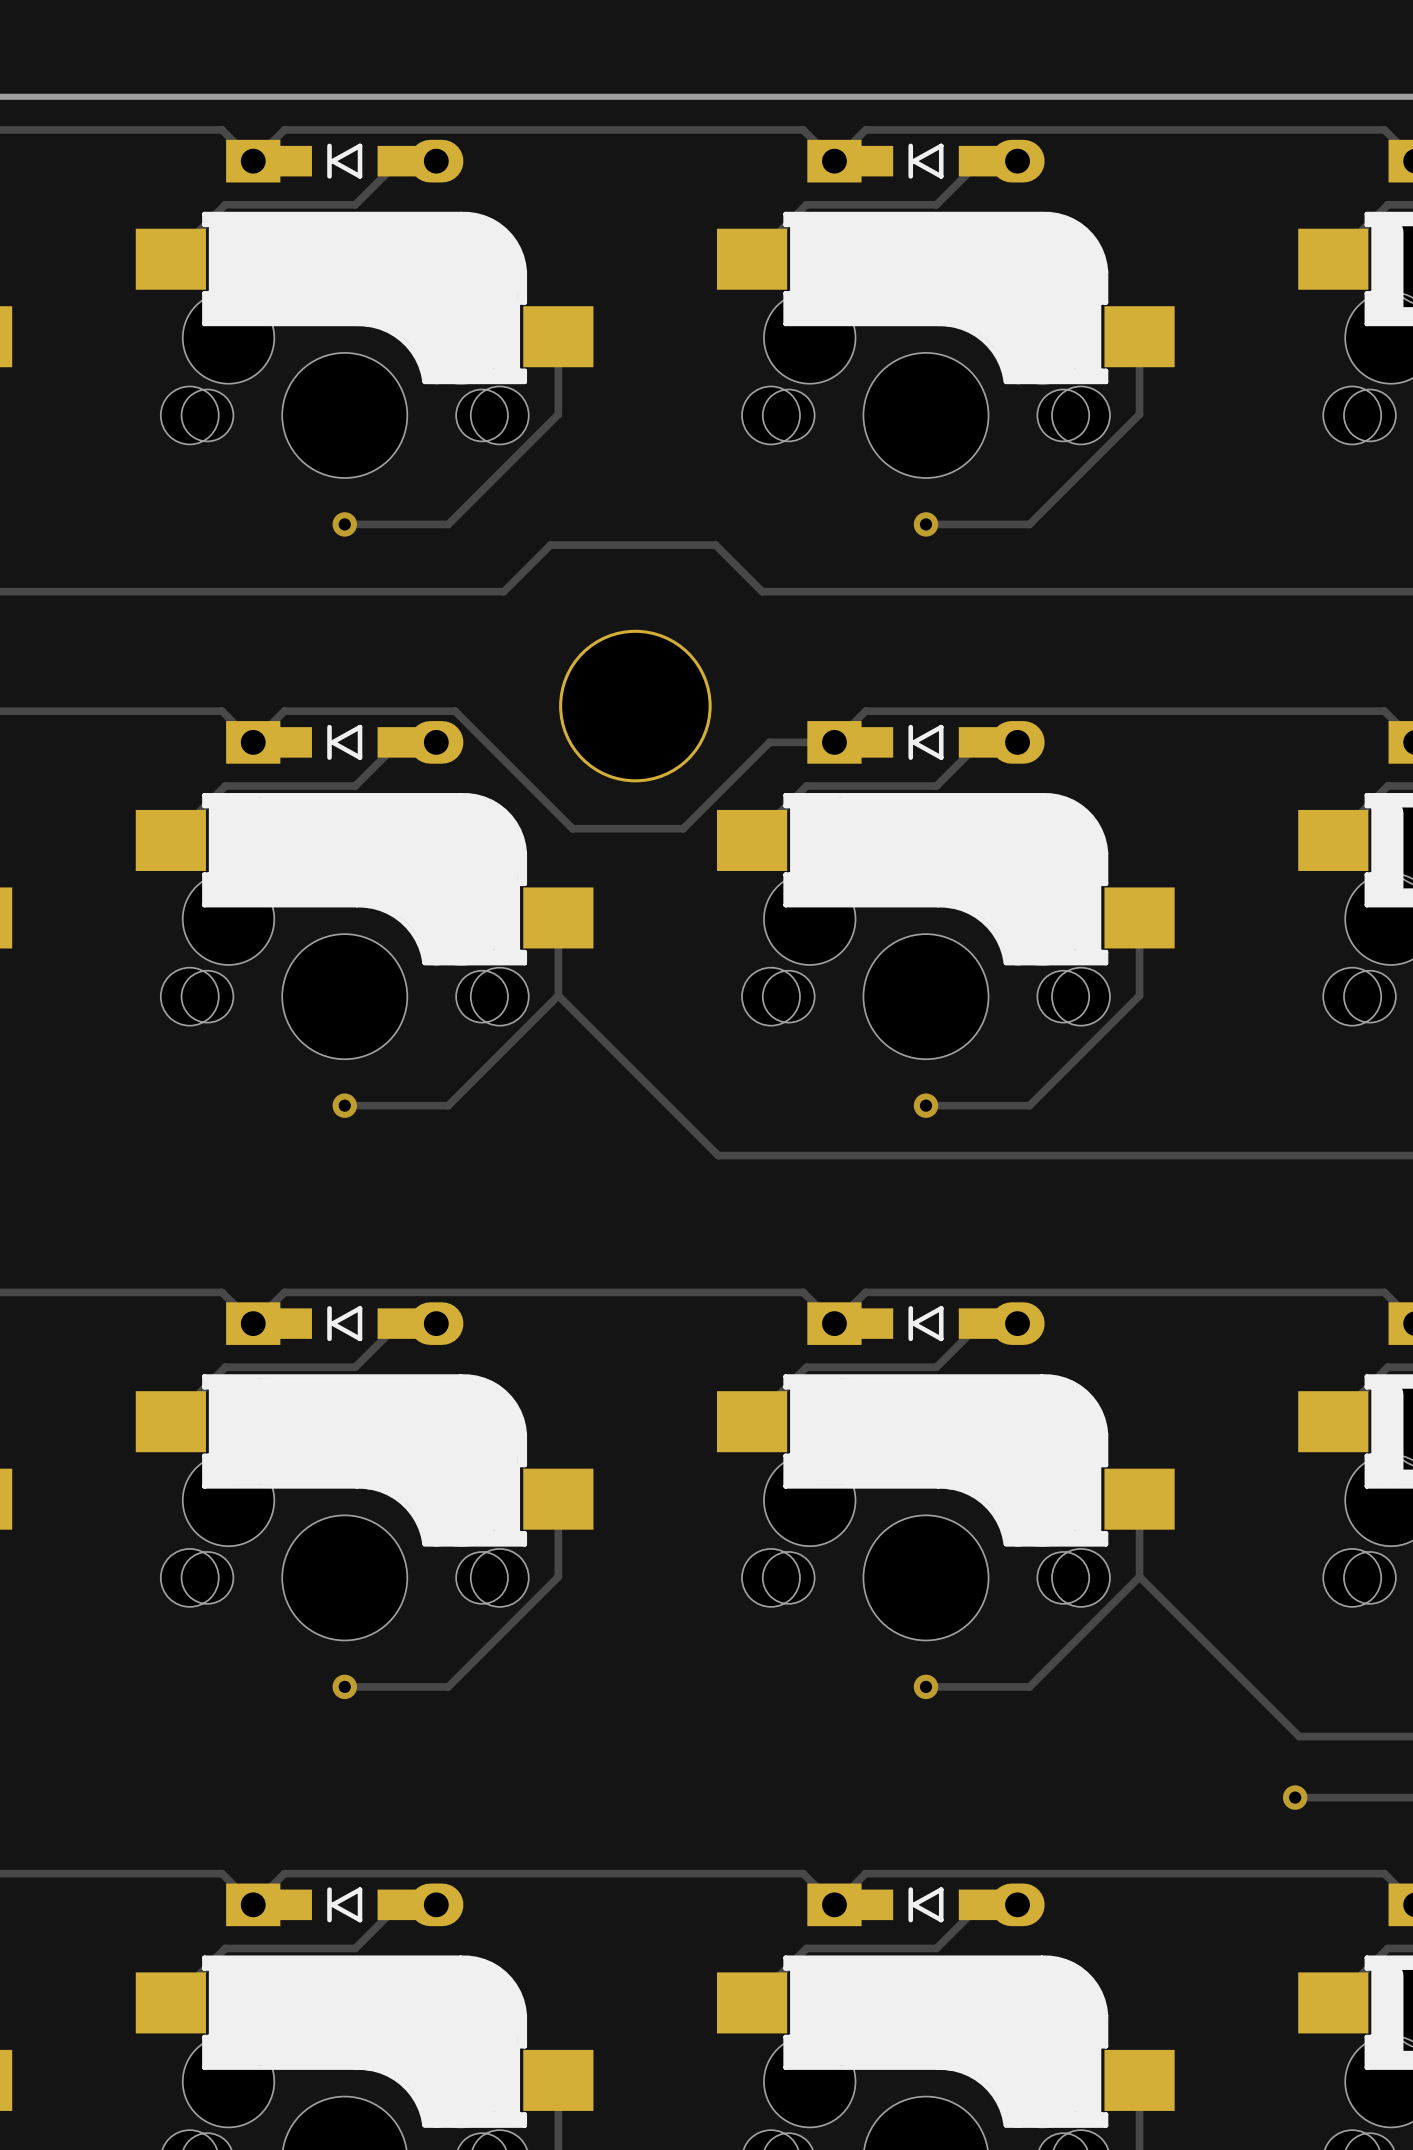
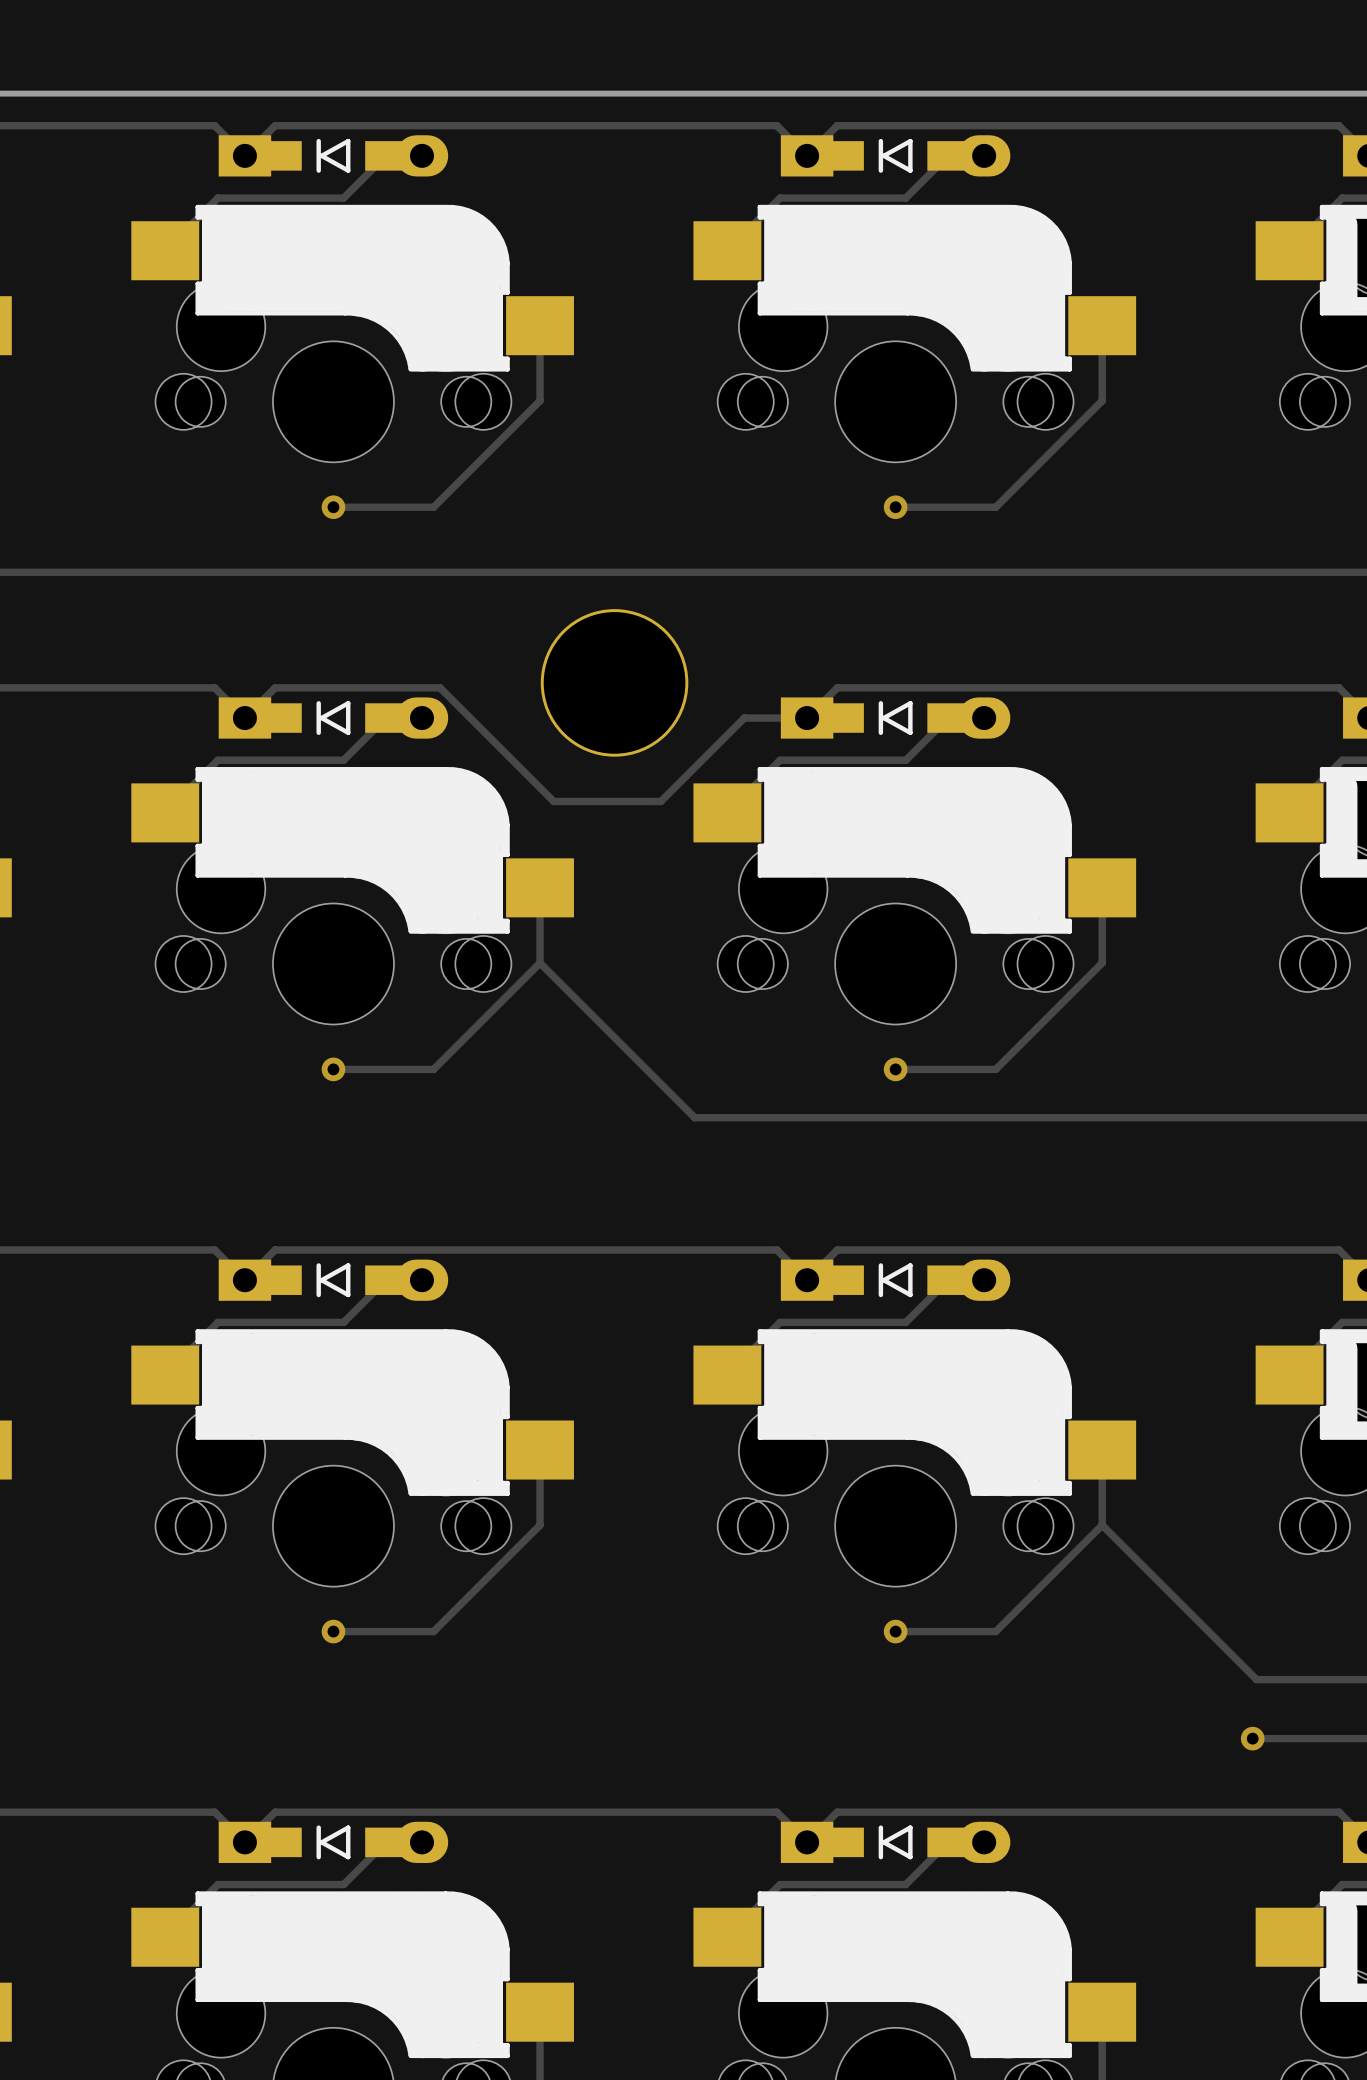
track: (503, 591) (550, 545) (715, 545) (762, 591) -> (487, 572) (737, 572)

